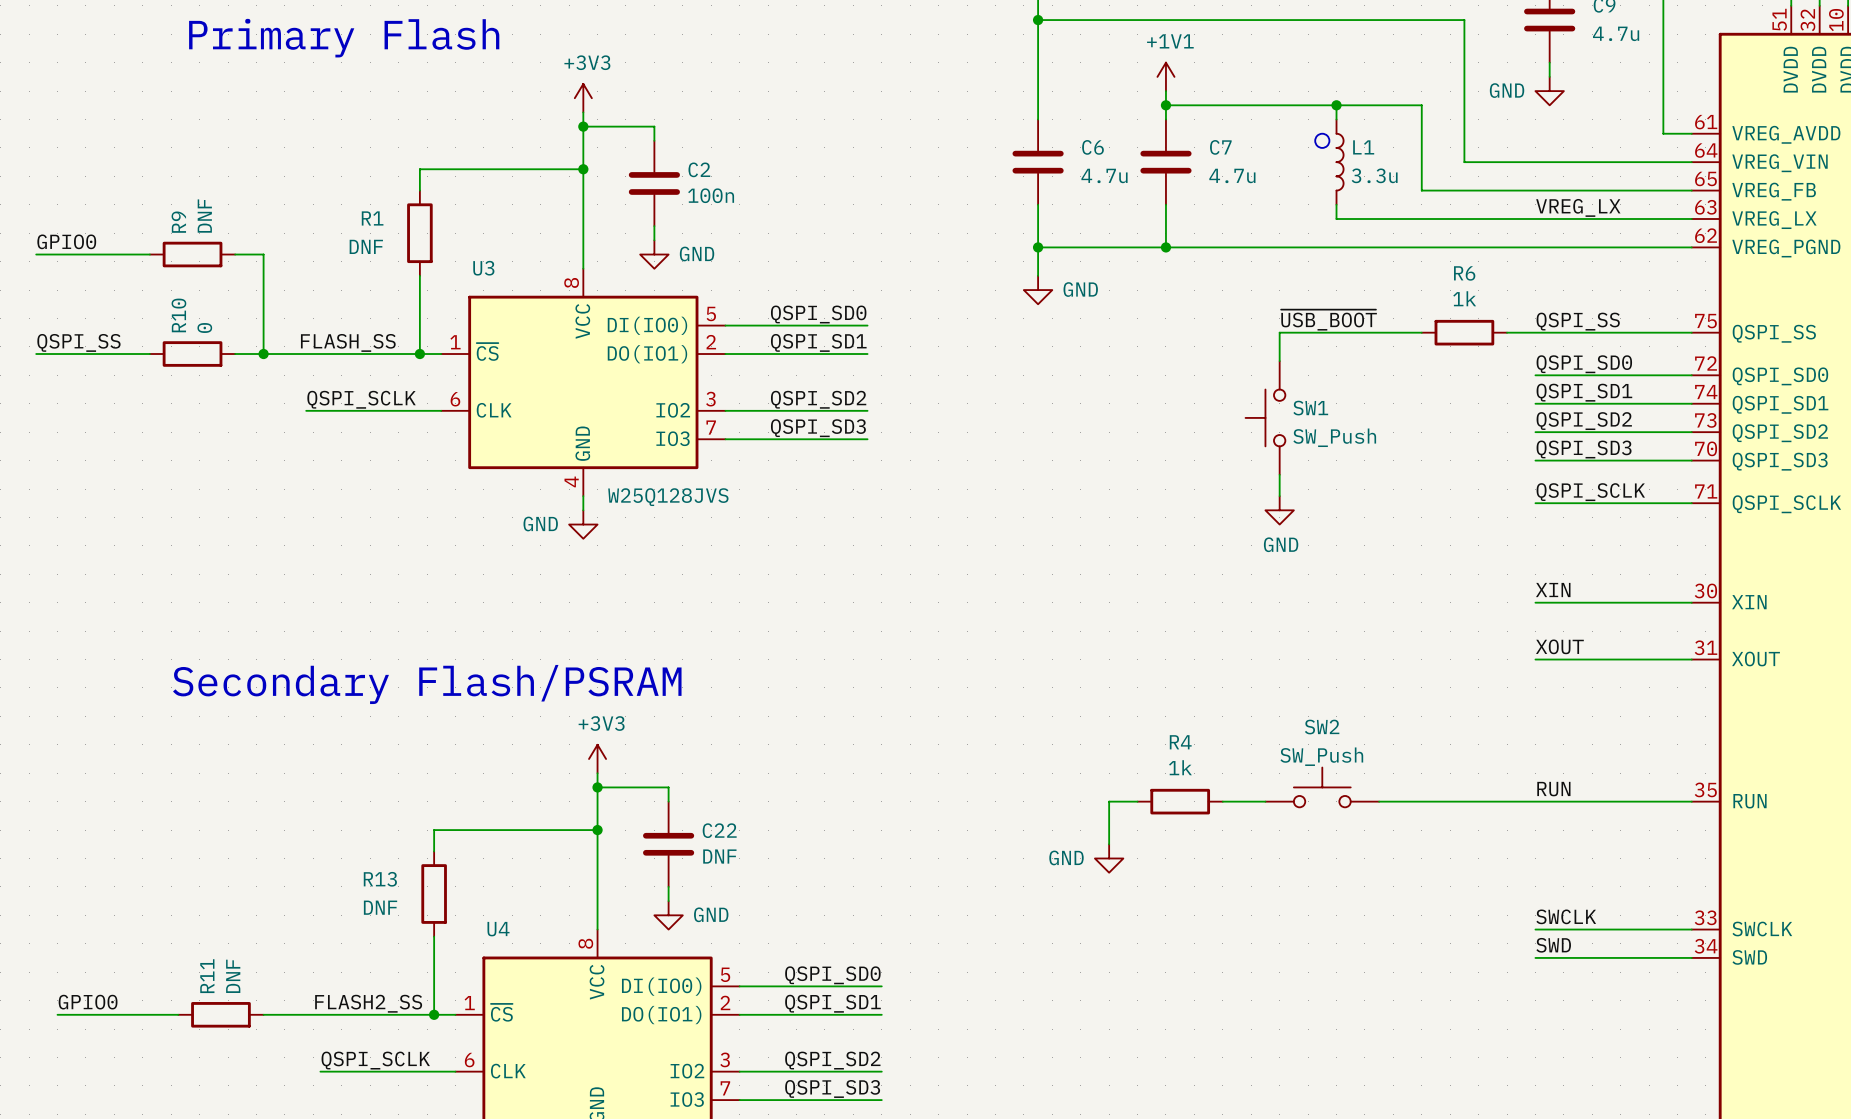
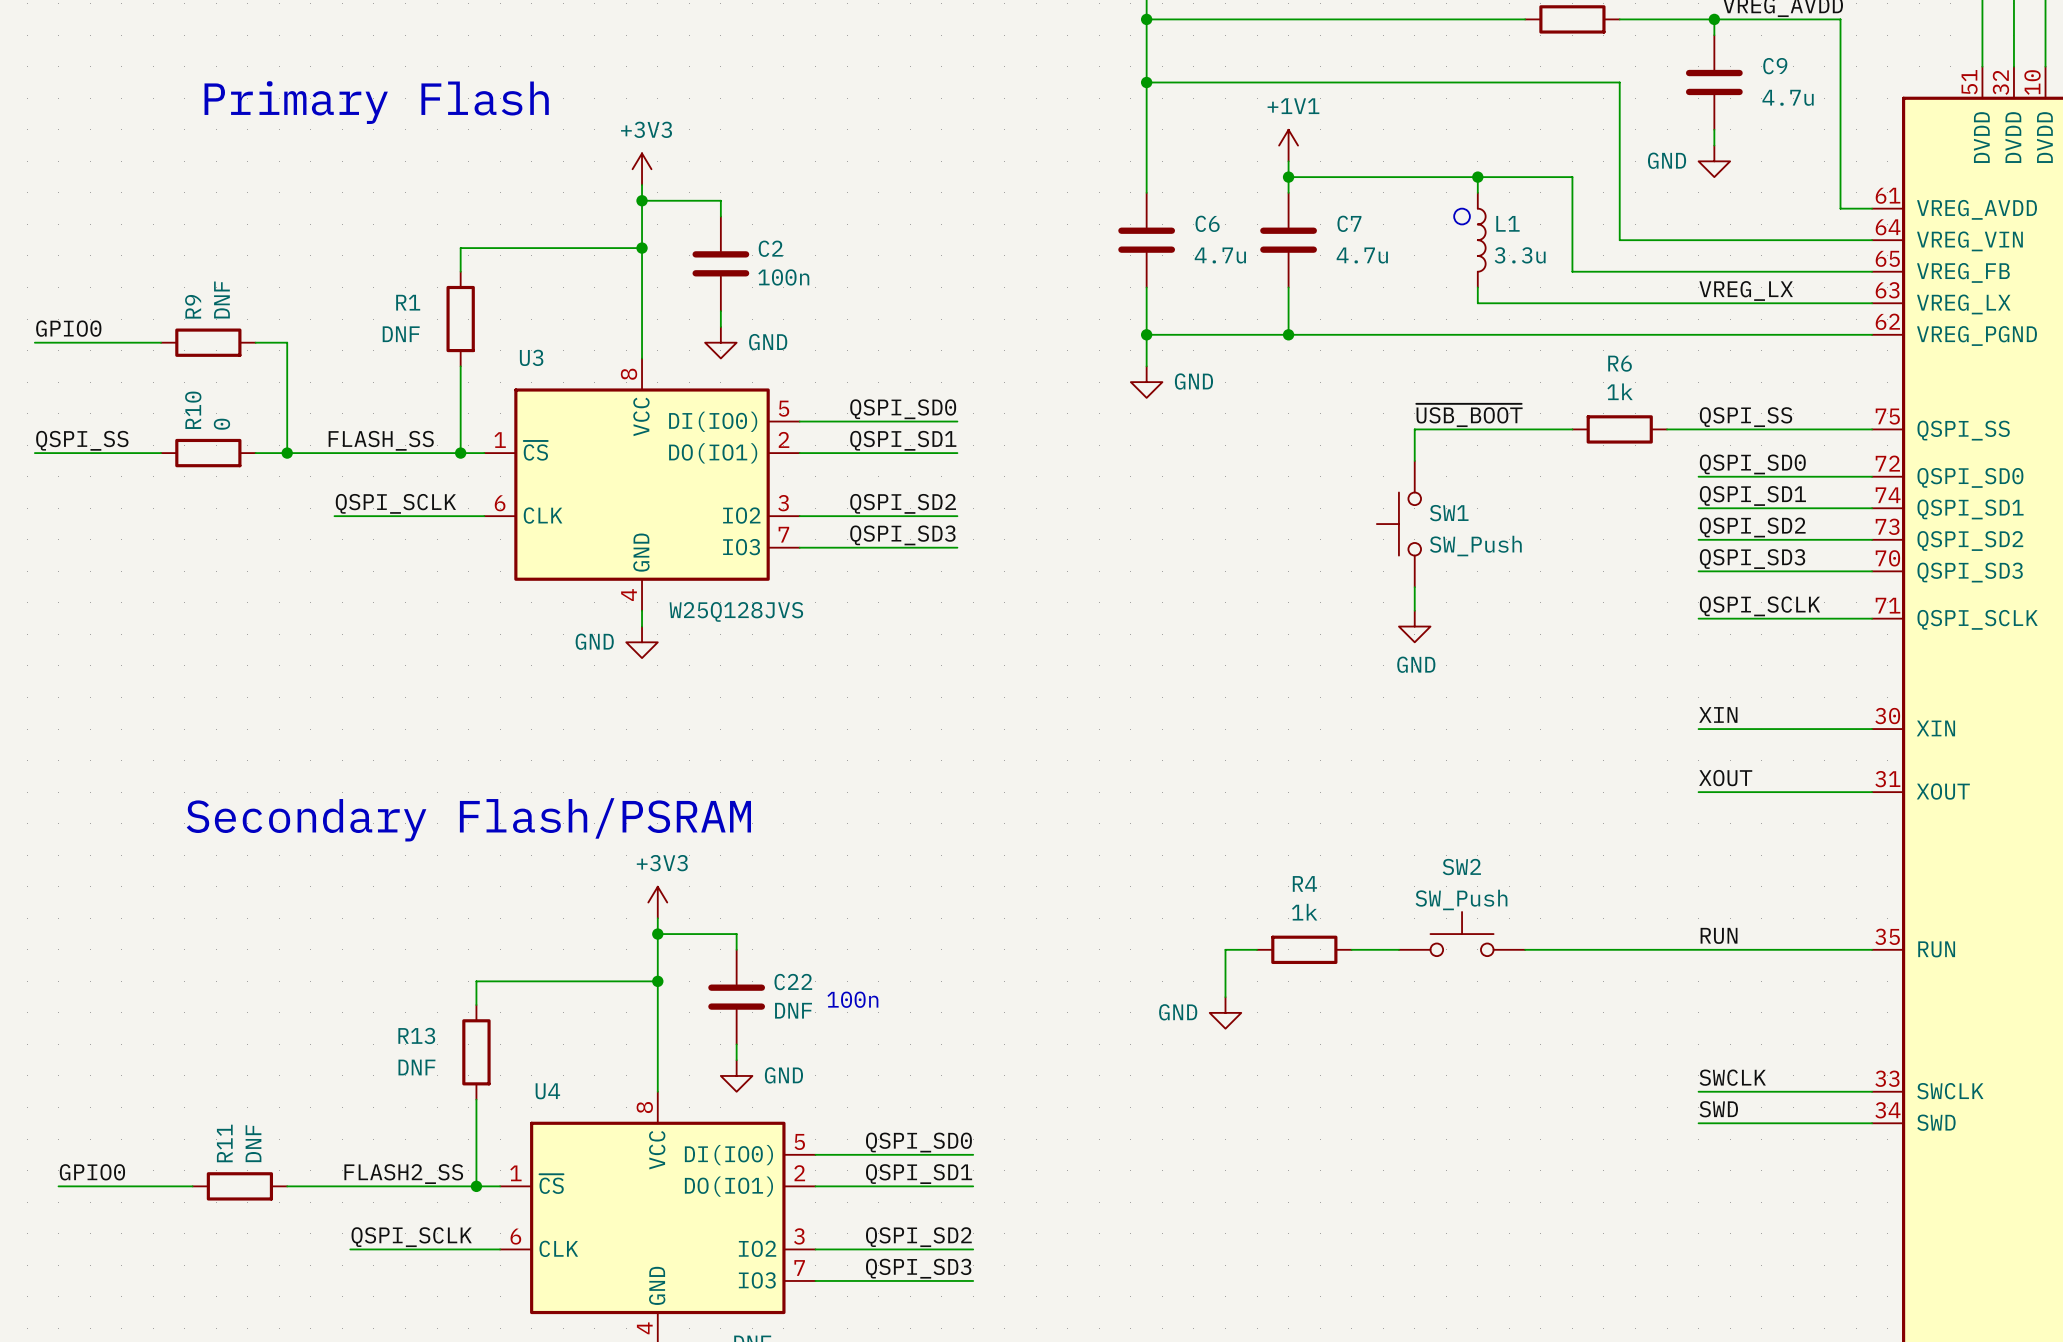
text: none -> 100n (852, 999)

